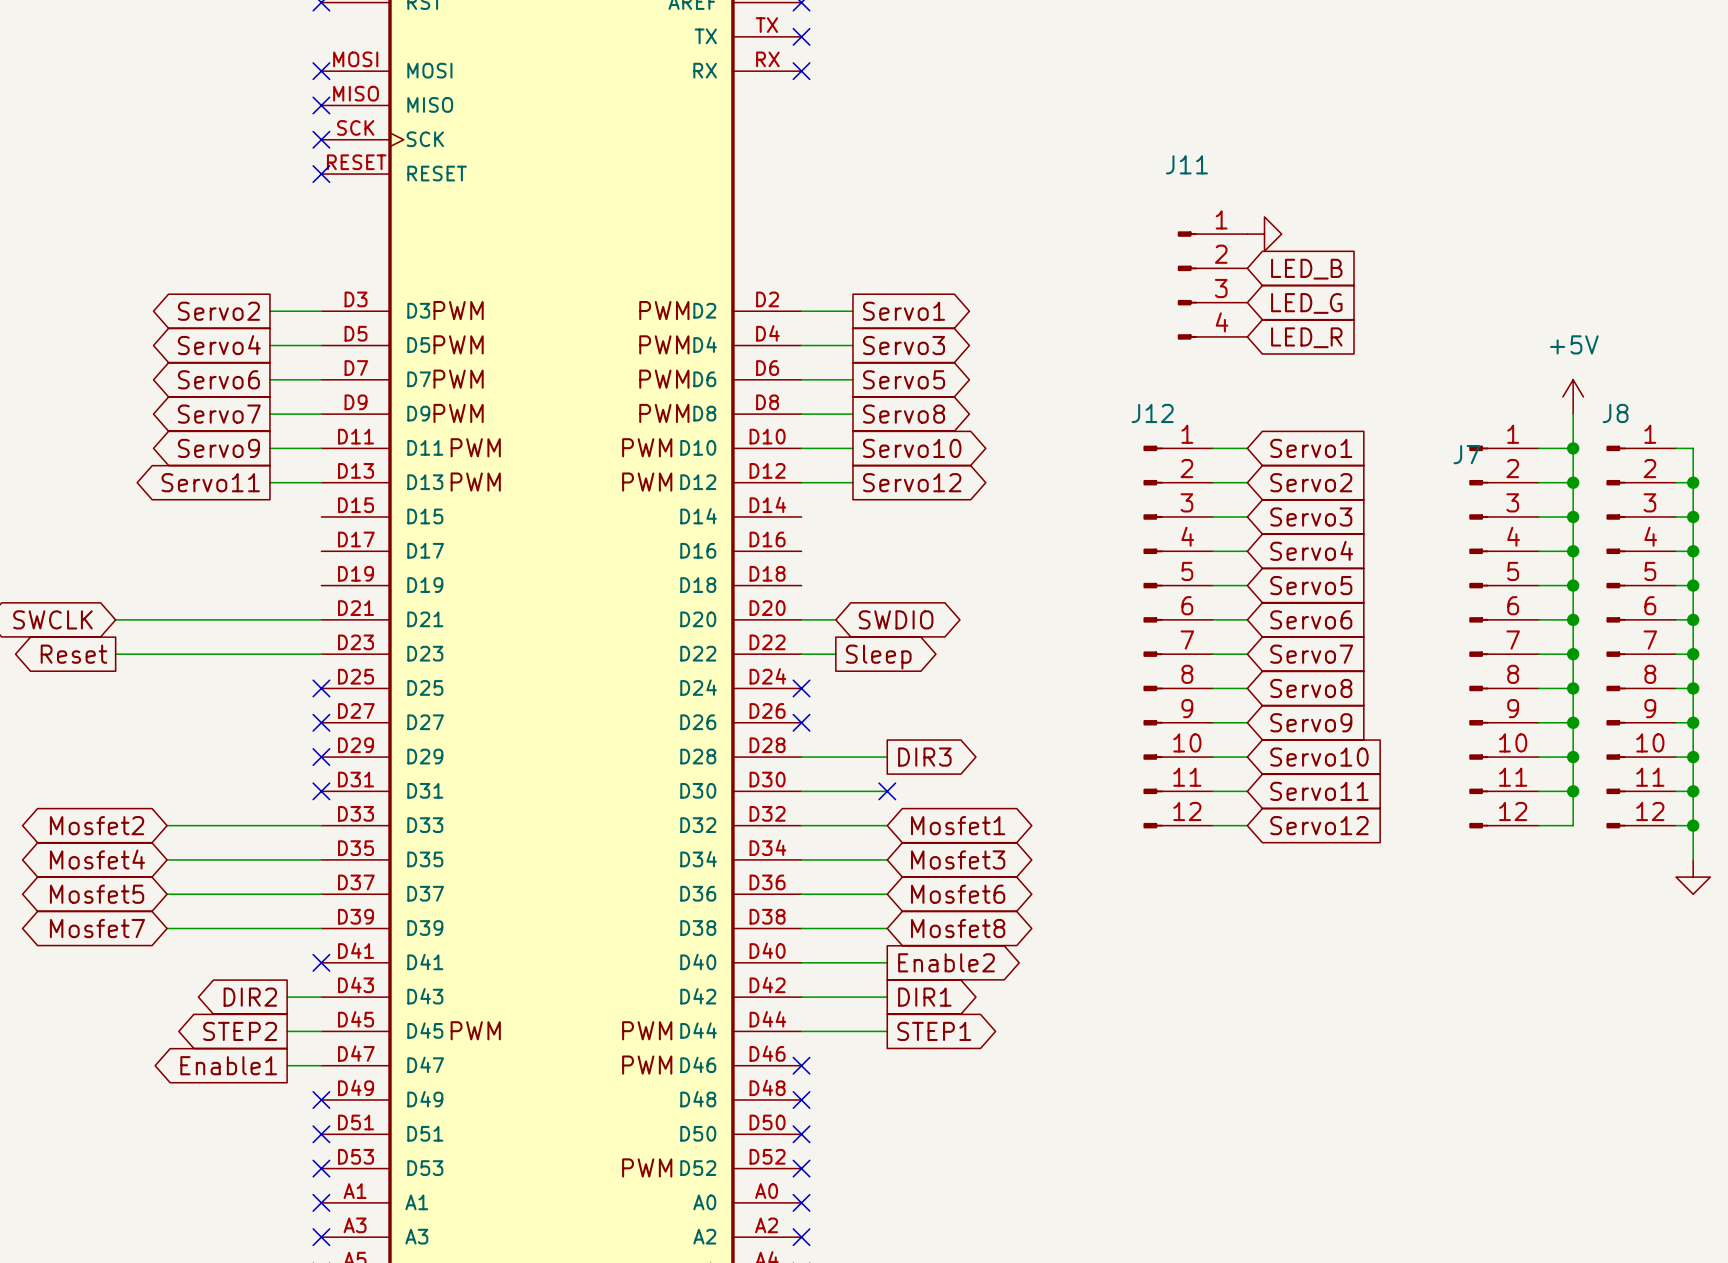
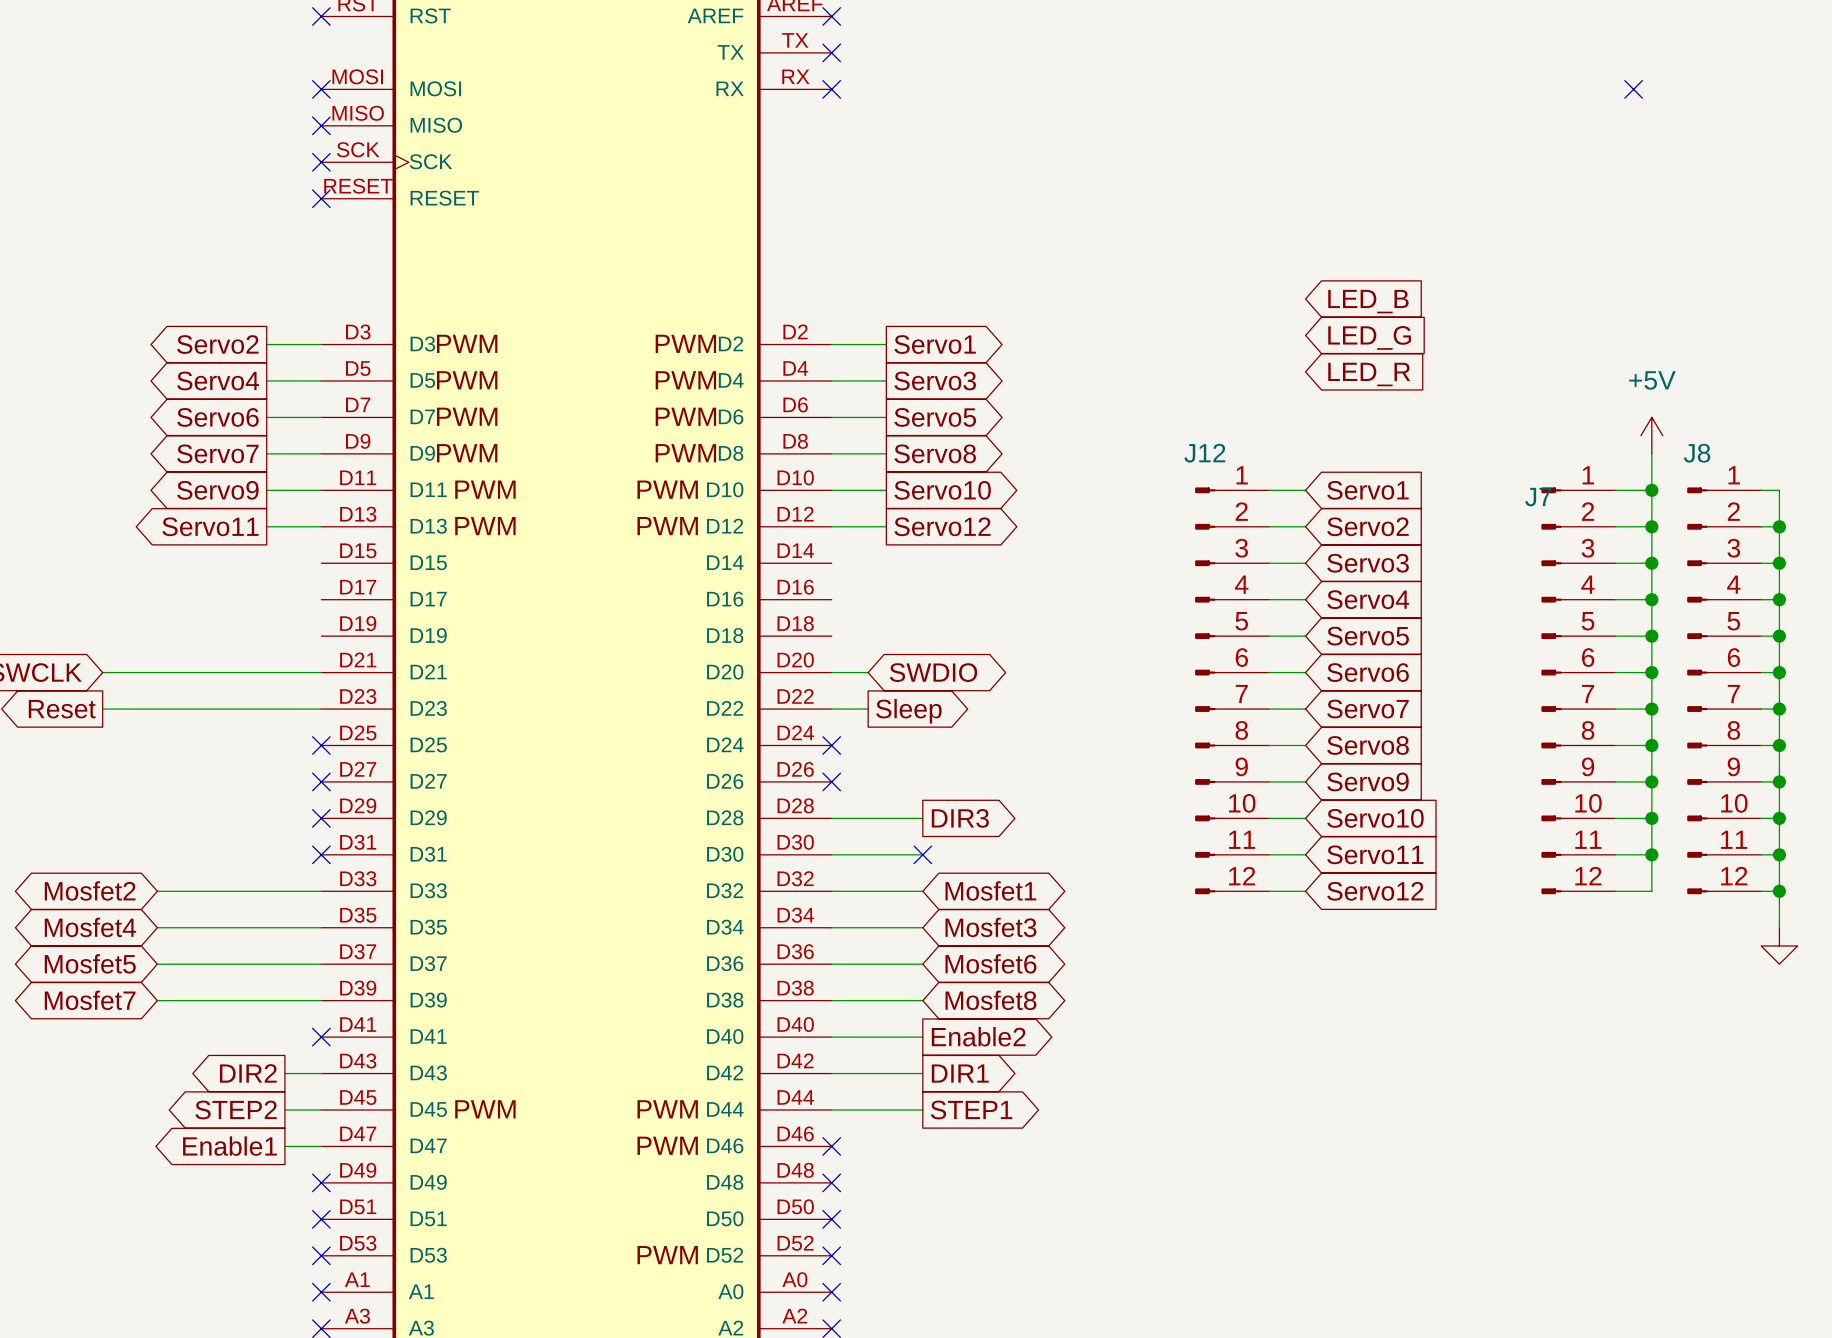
no-connect mark: none -> (1633, 89)
power symbol: (1264, 234) -> none
J11: (1212, 285) -> none

